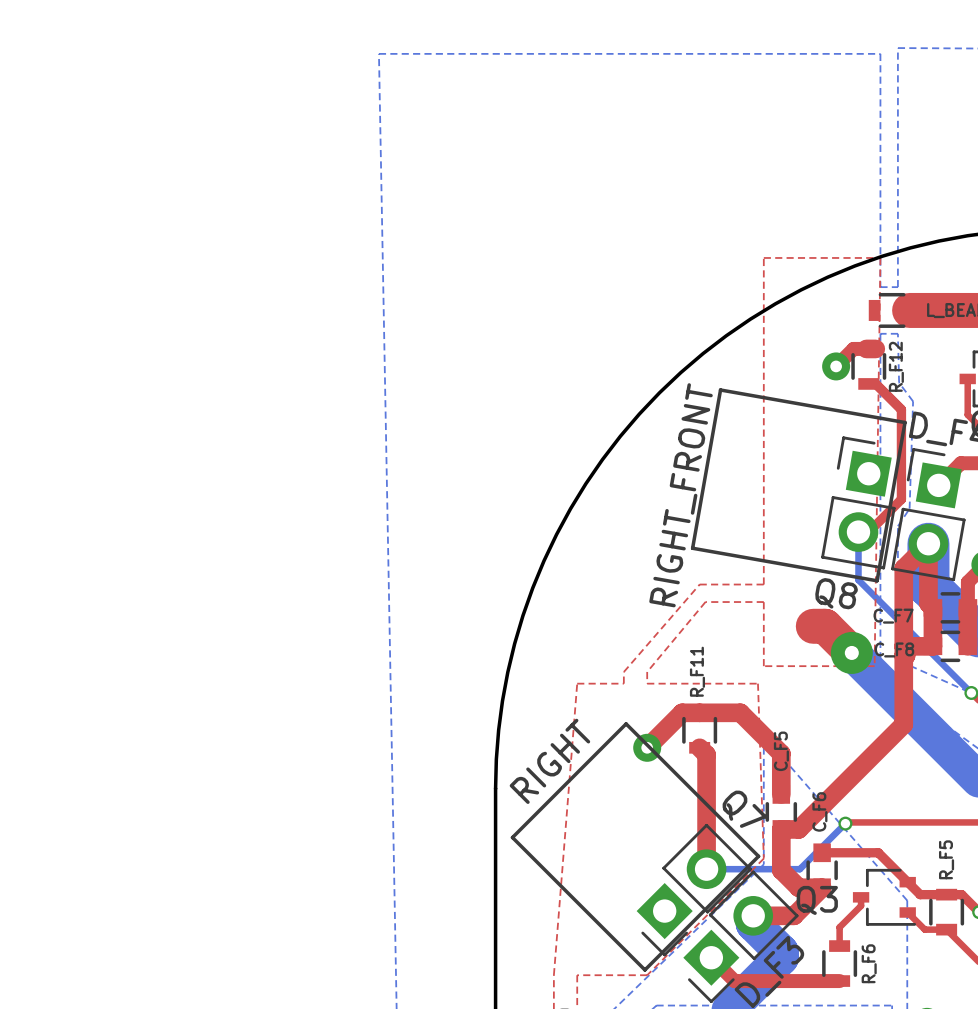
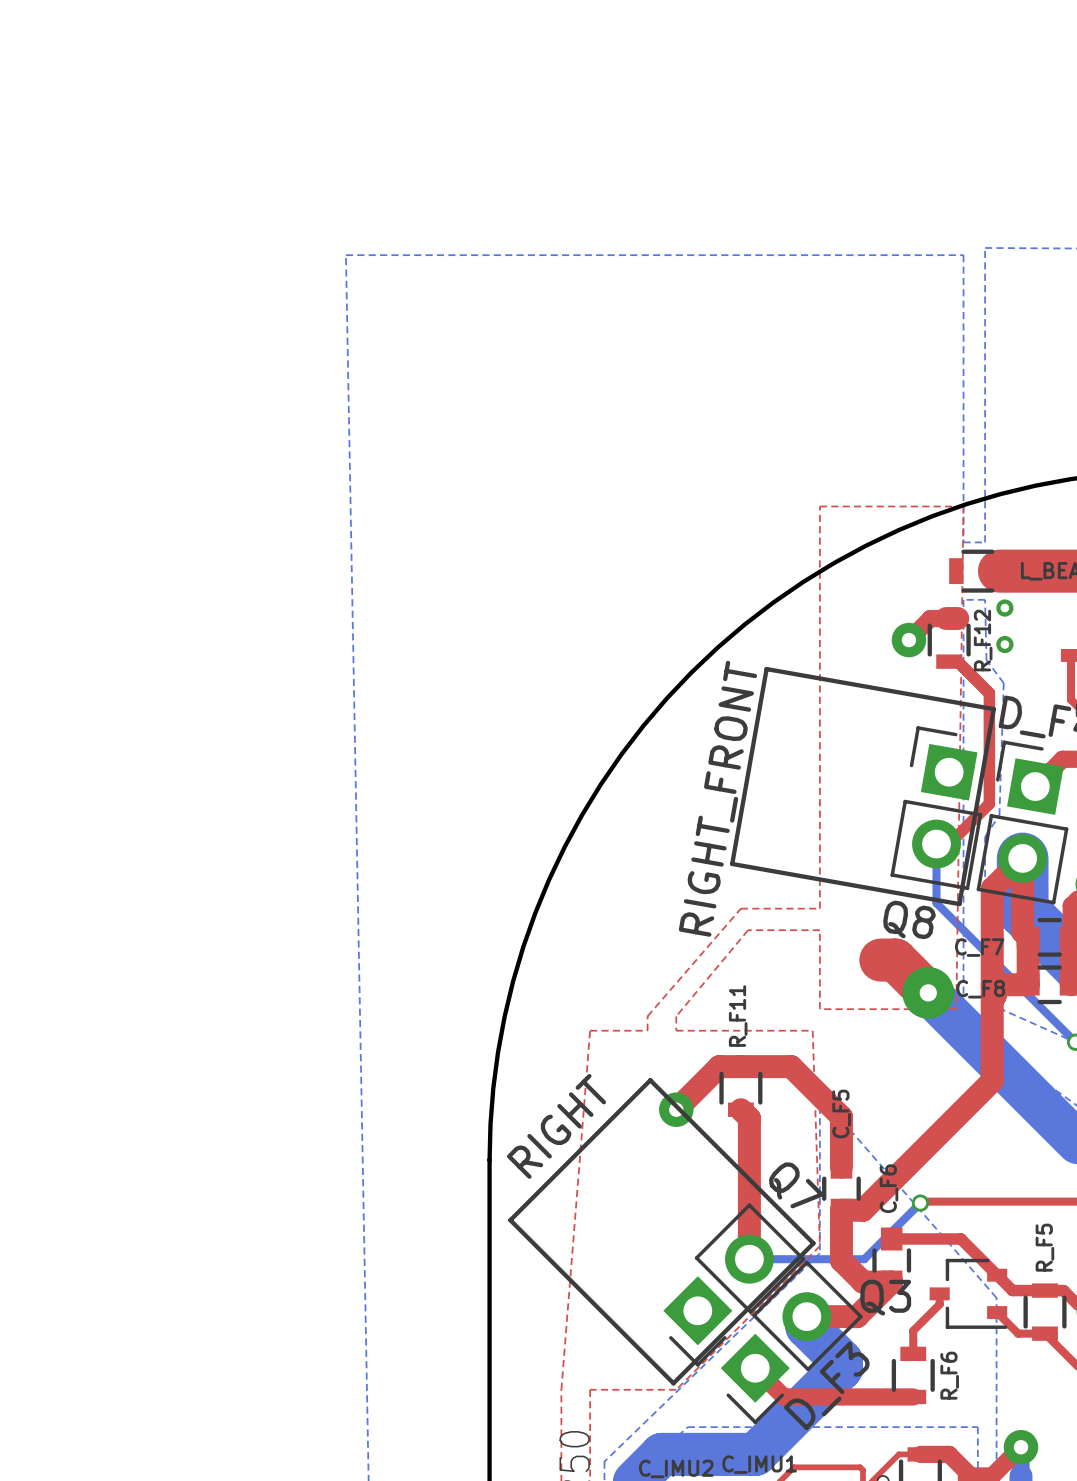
part: none -> (1004, 608)
part: none -> (1004, 644)

